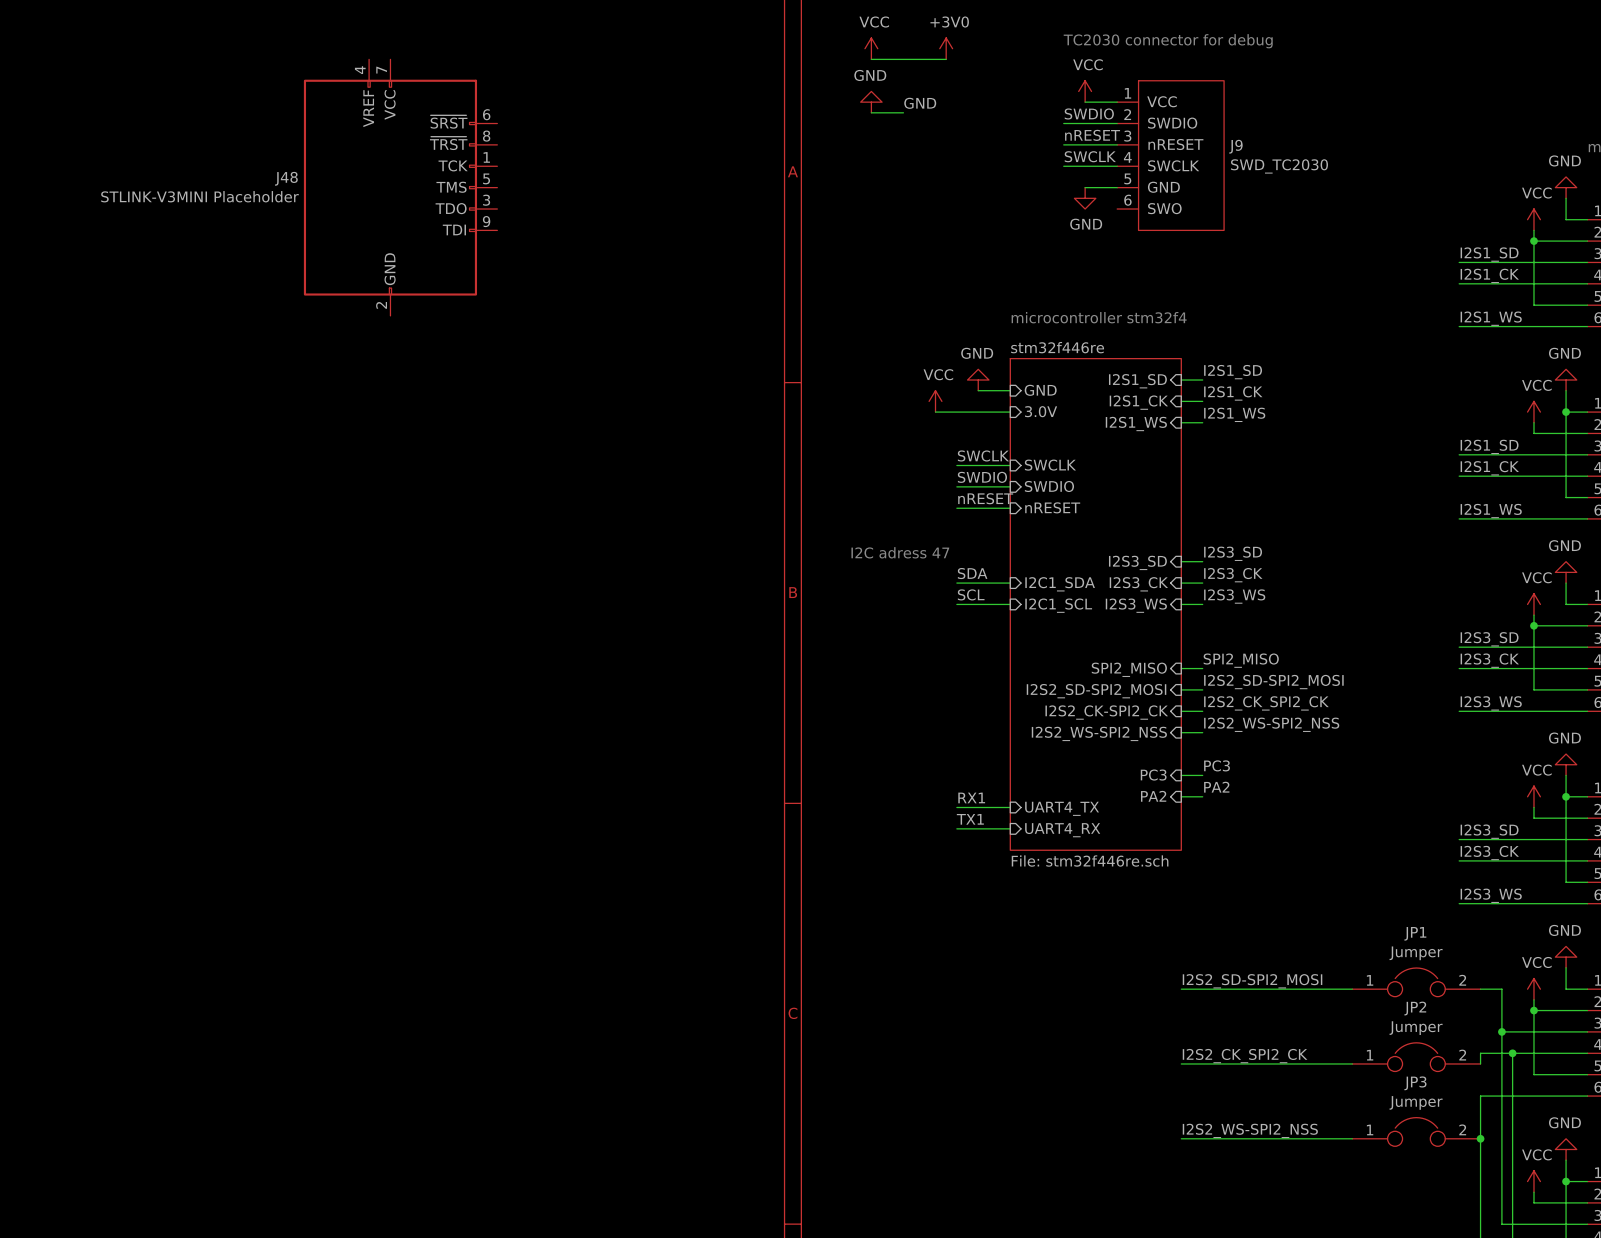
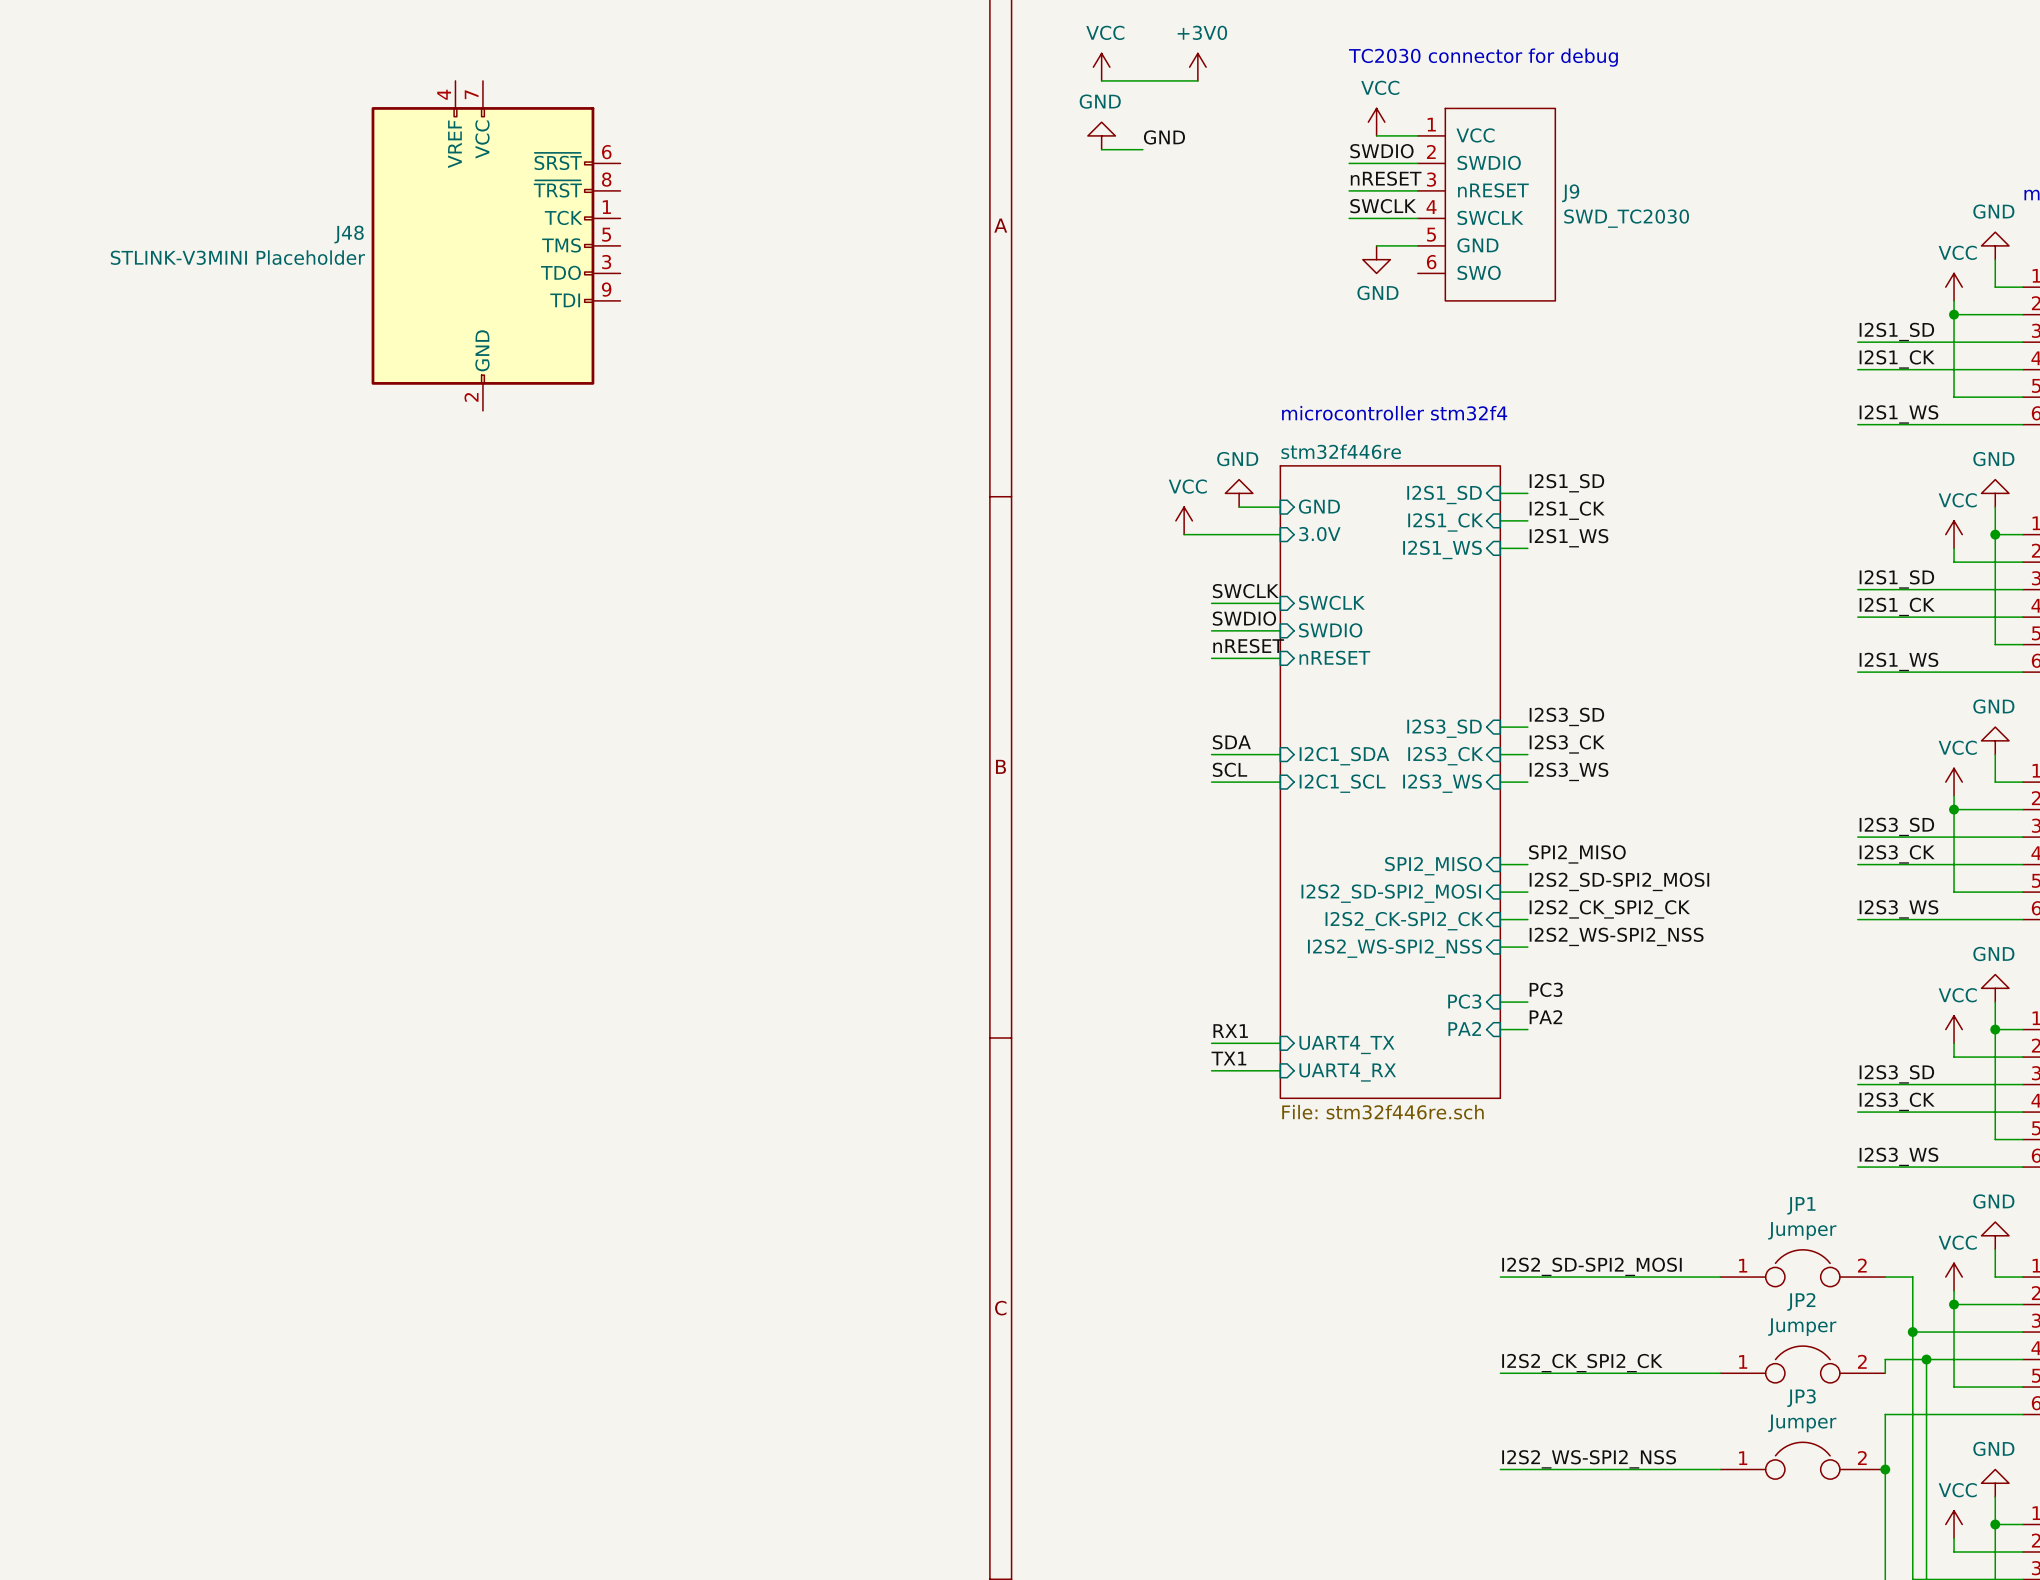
text: I2C adress 47 (900, 552) -> none

